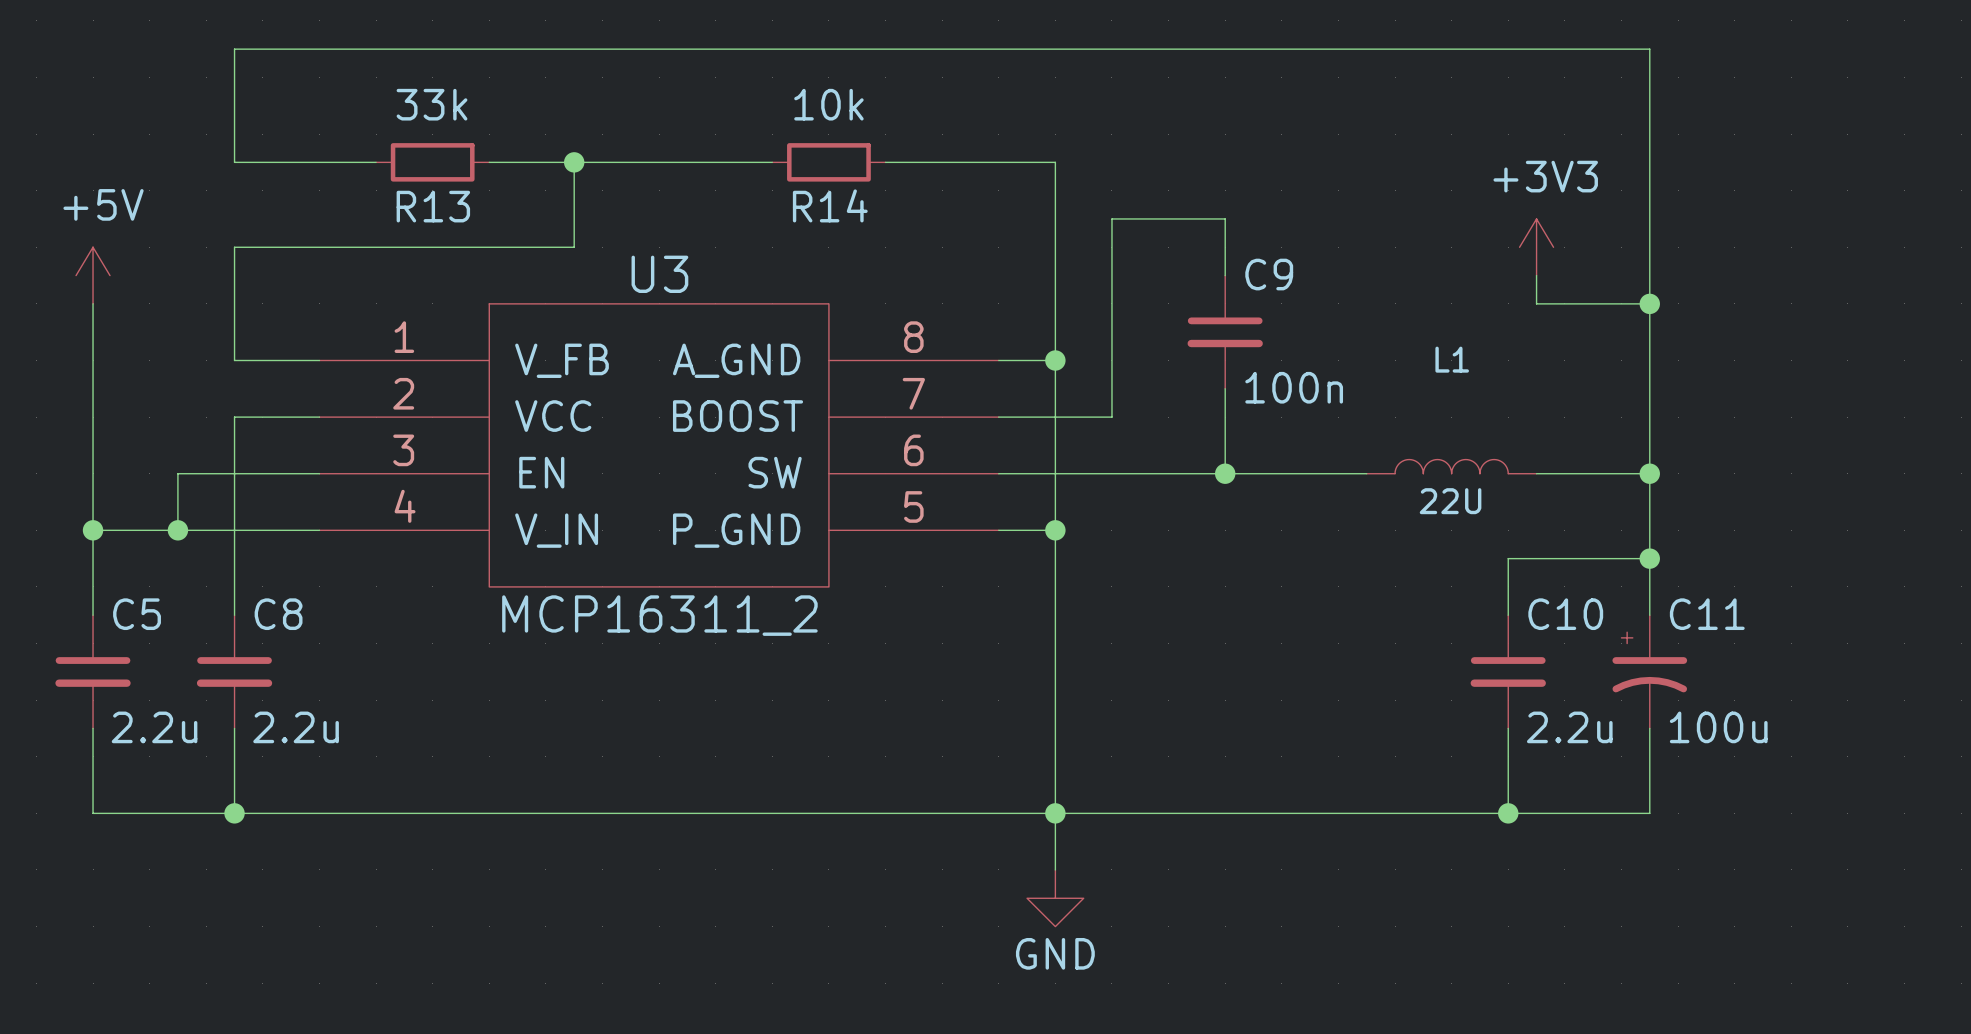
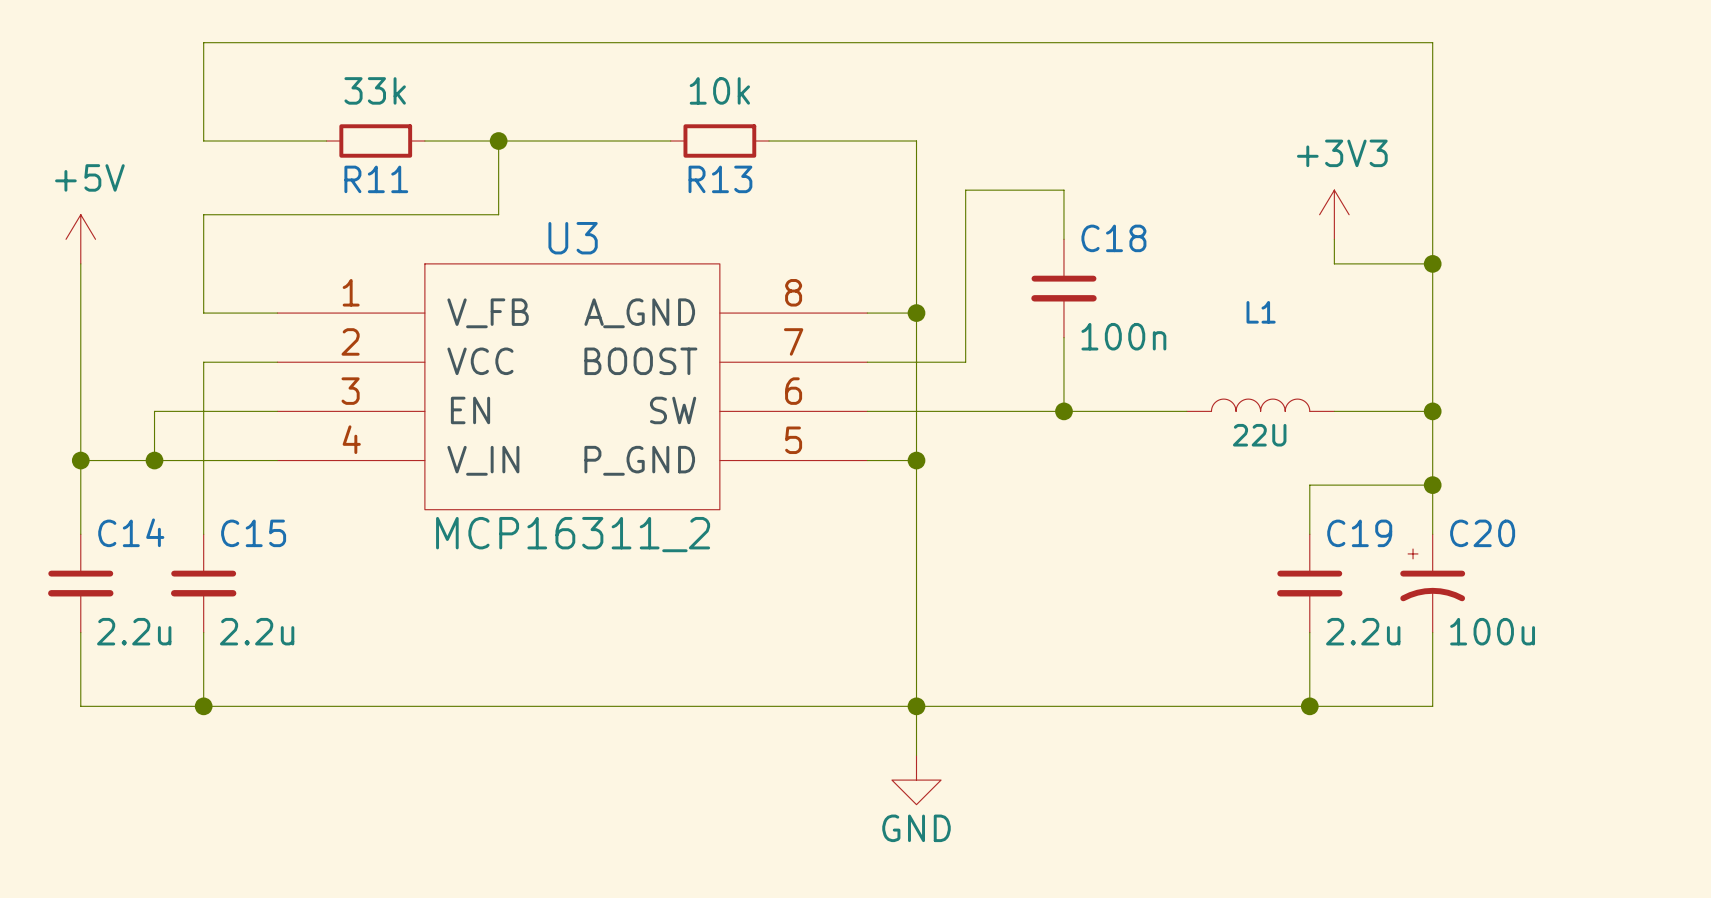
R14 name: R14 (830, 205) -> R13 (720, 179)
R13 name: R13 (433, 206) -> R11 (376, 179)
C9 name: C9 (1269, 274) -> C18 (1113, 238)
C5 name: C5 (137, 614) -> C14 (131, 532)
C8 name: C8 (278, 614) -> C15 (253, 533)
C10 name: C10 (1565, 614) -> C19 (1359, 533)
C11 name: C11 (1707, 614) -> C20 (1482, 533)

